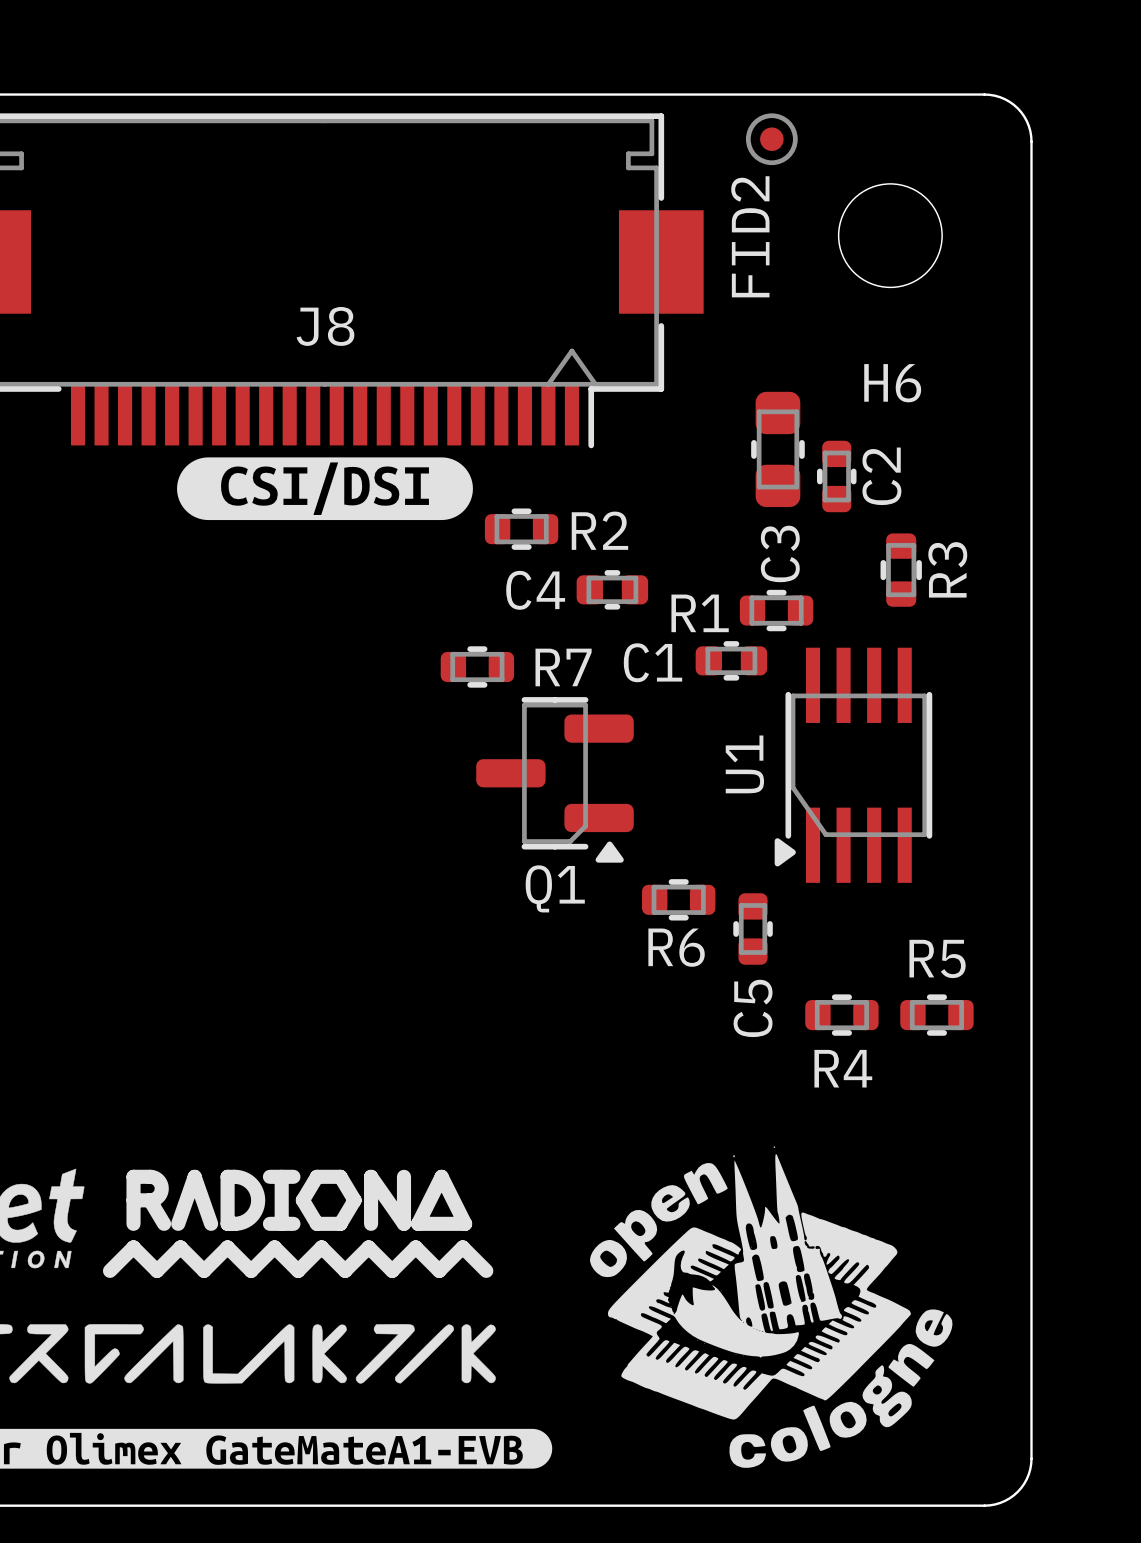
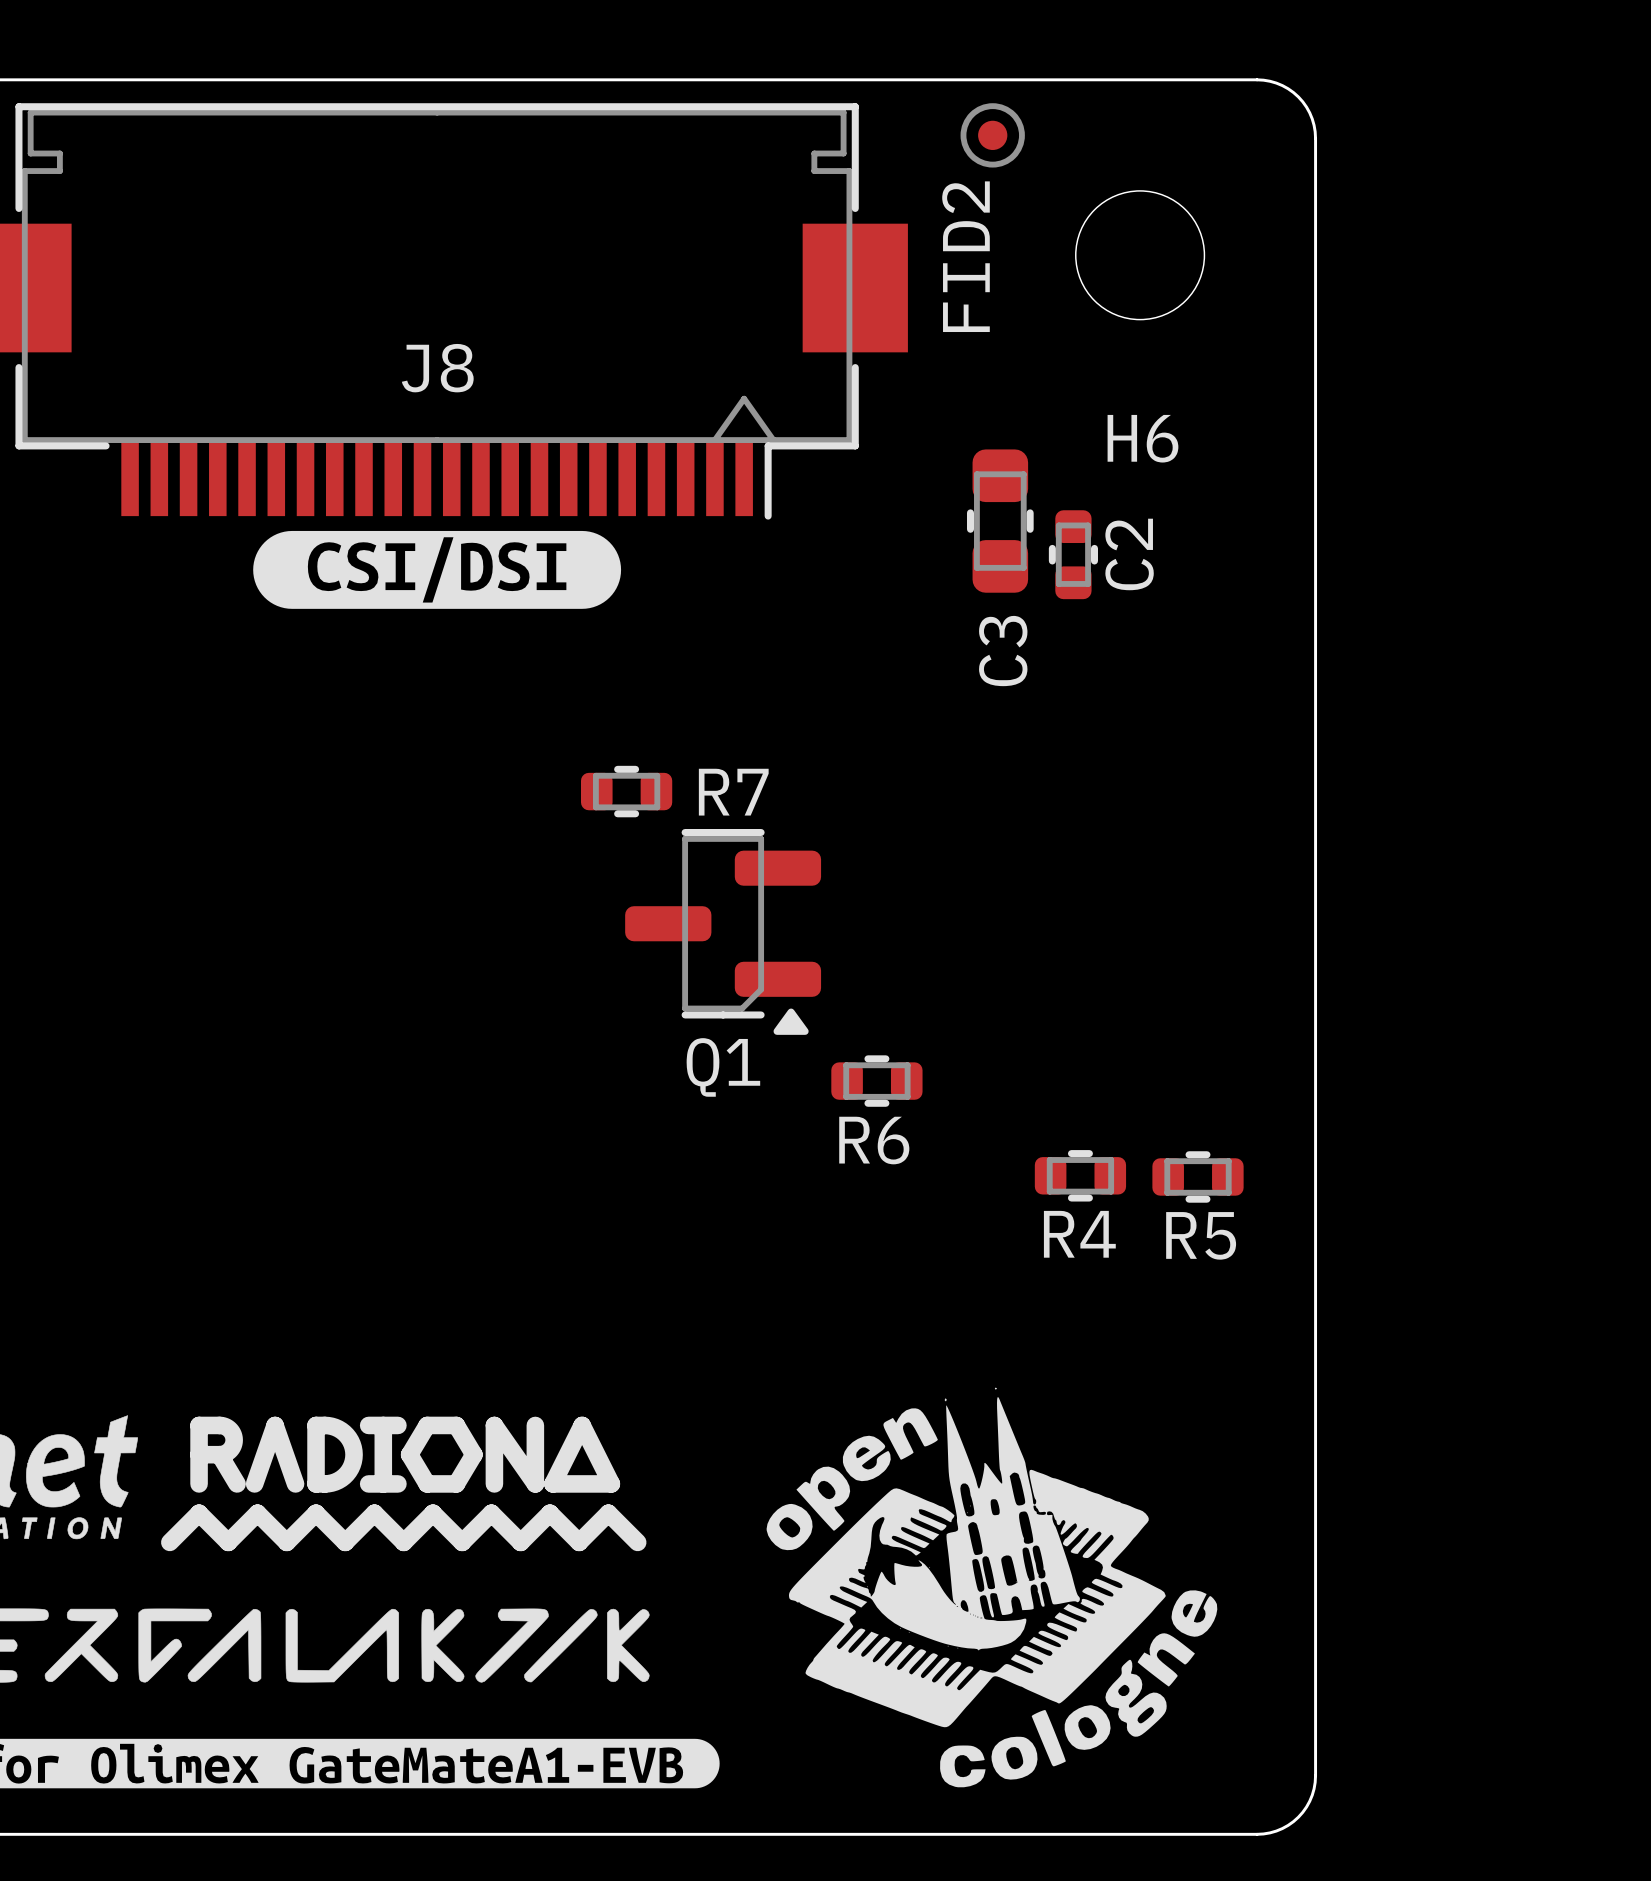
R2: (521, 529) -> none
R3: (901, 570) -> none
C4: (612, 589) -> none
R1: (776, 610) -> none
C1: (731, 660) -> none
U1: (853, 765) -> none
C5: (753, 928) -> none
R5 name position: R5 (937, 958) -> R5 (1201, 1235)
R4 position: (841, 1015) -> (1080, 1175)
R5 position: (936, 1015) -> (1198, 1176)
R4 name position: R4 (843, 1068) -> R4 (1079, 1234)

